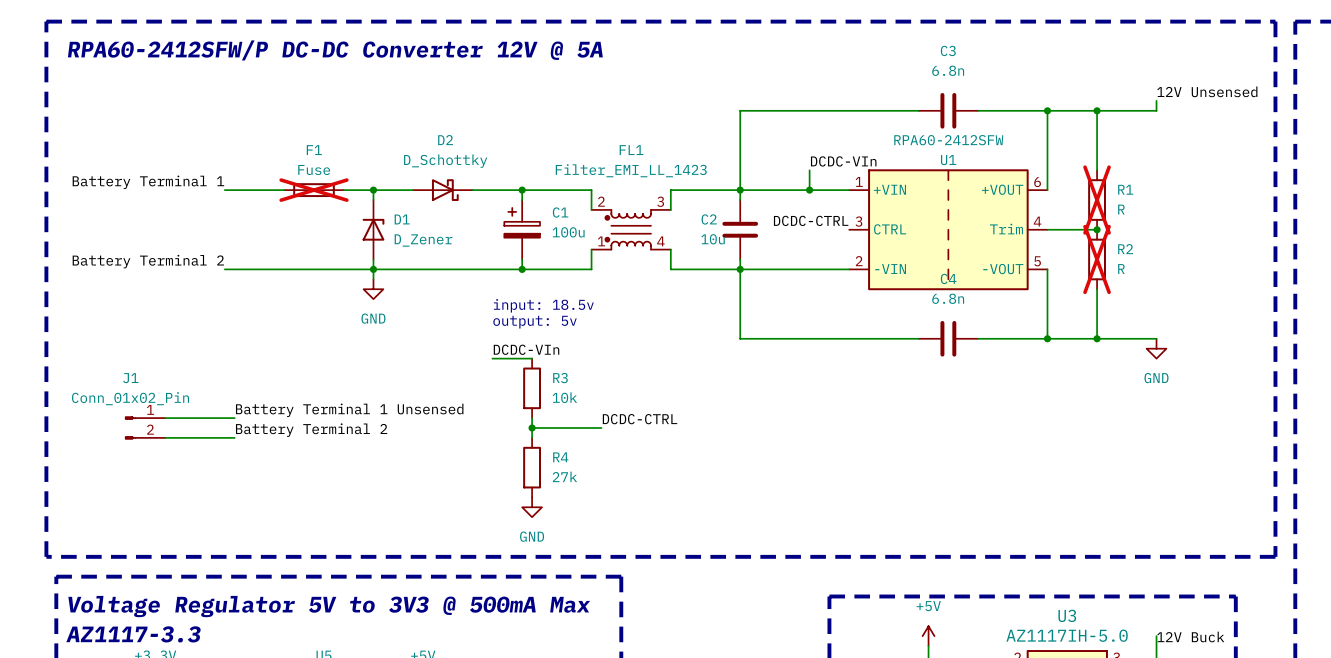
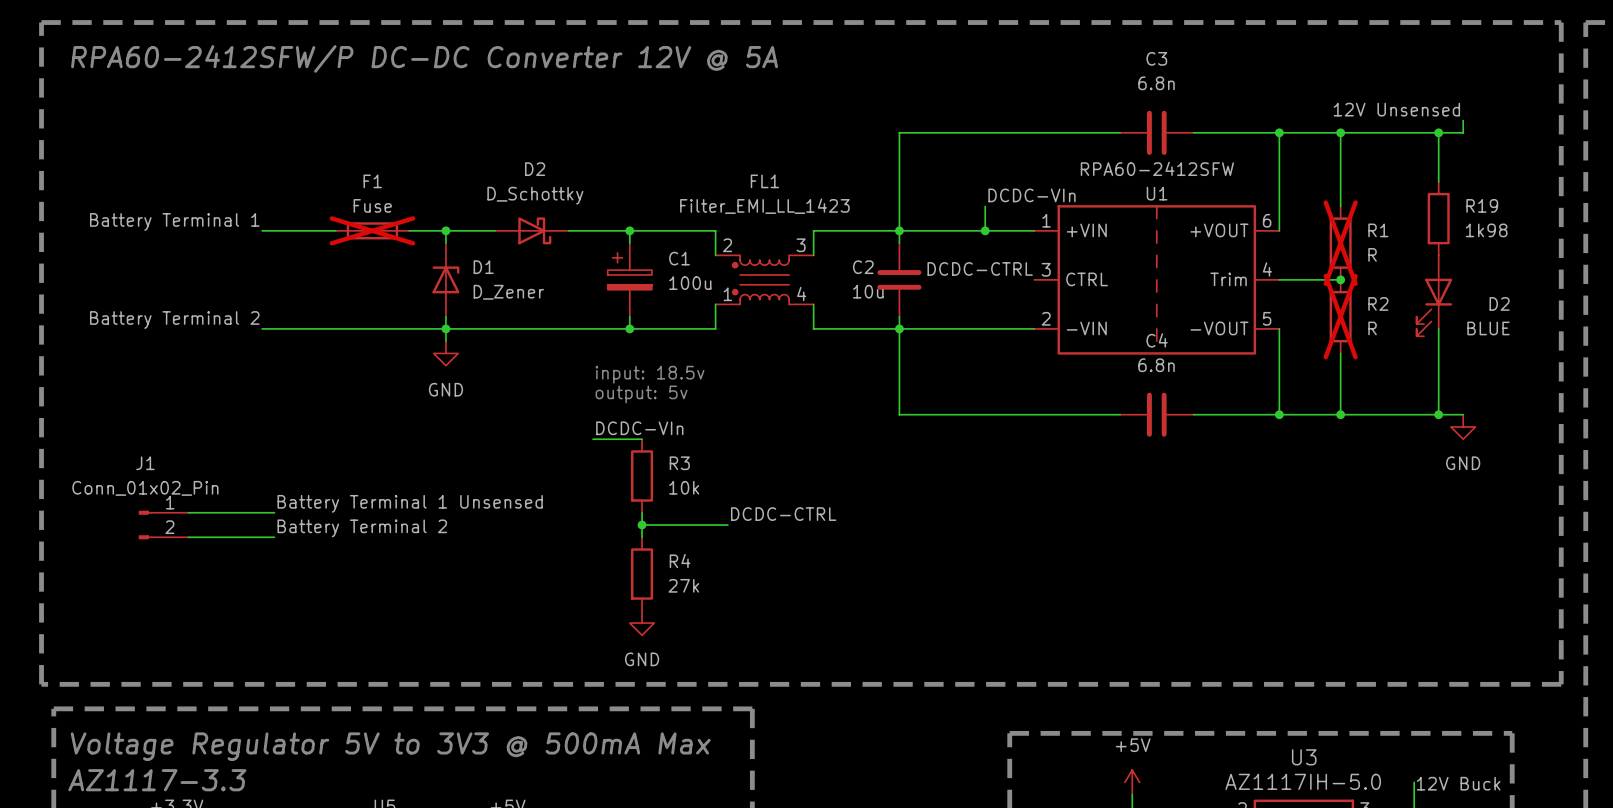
label position: 12V Unsensed (1207, 91) -> 12V Unsensed (1396, 109)
wire: (1156, 100) (1156, 110) -> (1463, 120) (1463, 132) (1414, 132)
wire: none -> (1438, 132) (1438, 181)
junction: none -> (1438, 132)
R19: none -> 1k98 (1438, 218)
D2: none -> BLUE (1434, 295)
wire: none -> (1438, 328) (1438, 414)
wire: none -> (1414, 414) (1463, 414)
junction: none -> (1438, 414)
power symbol position: GND (1156, 348) -> GND (1463, 426)

